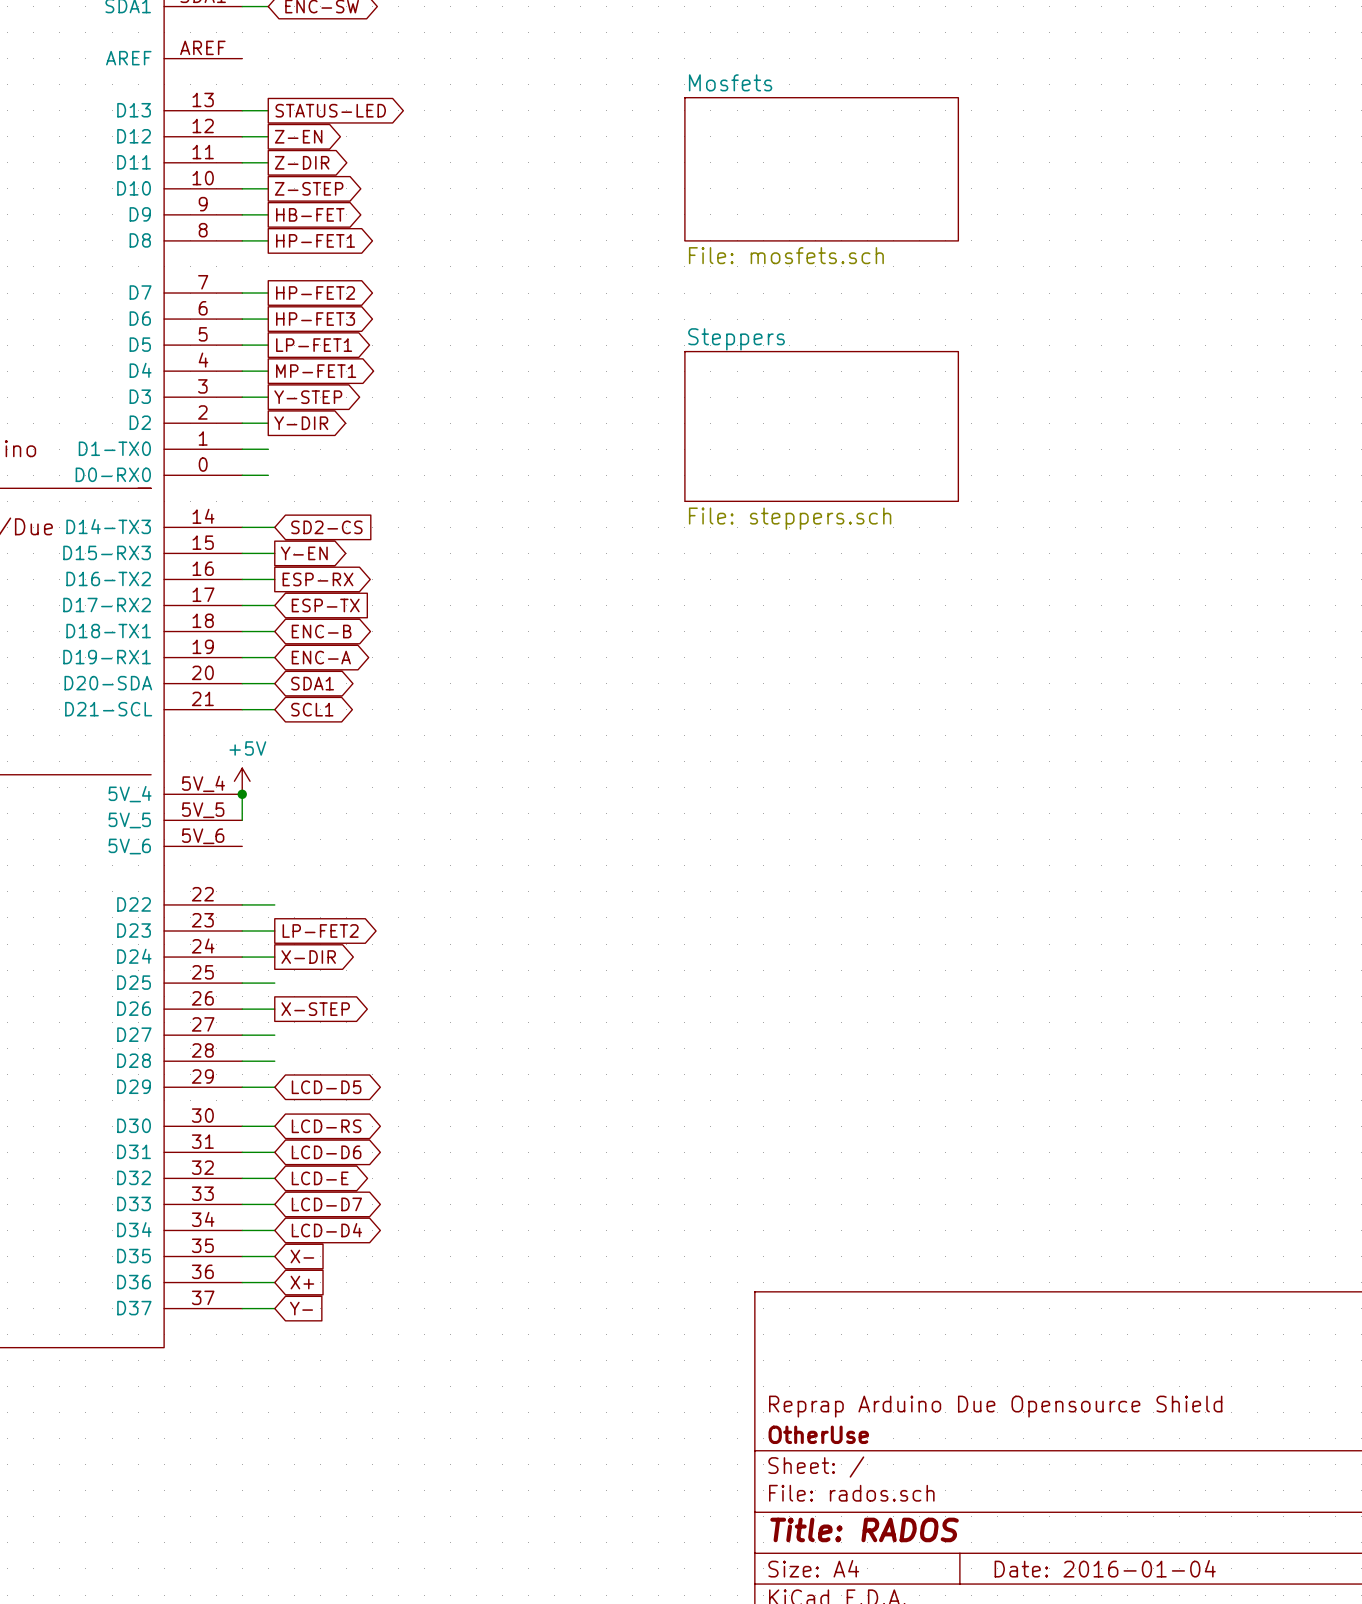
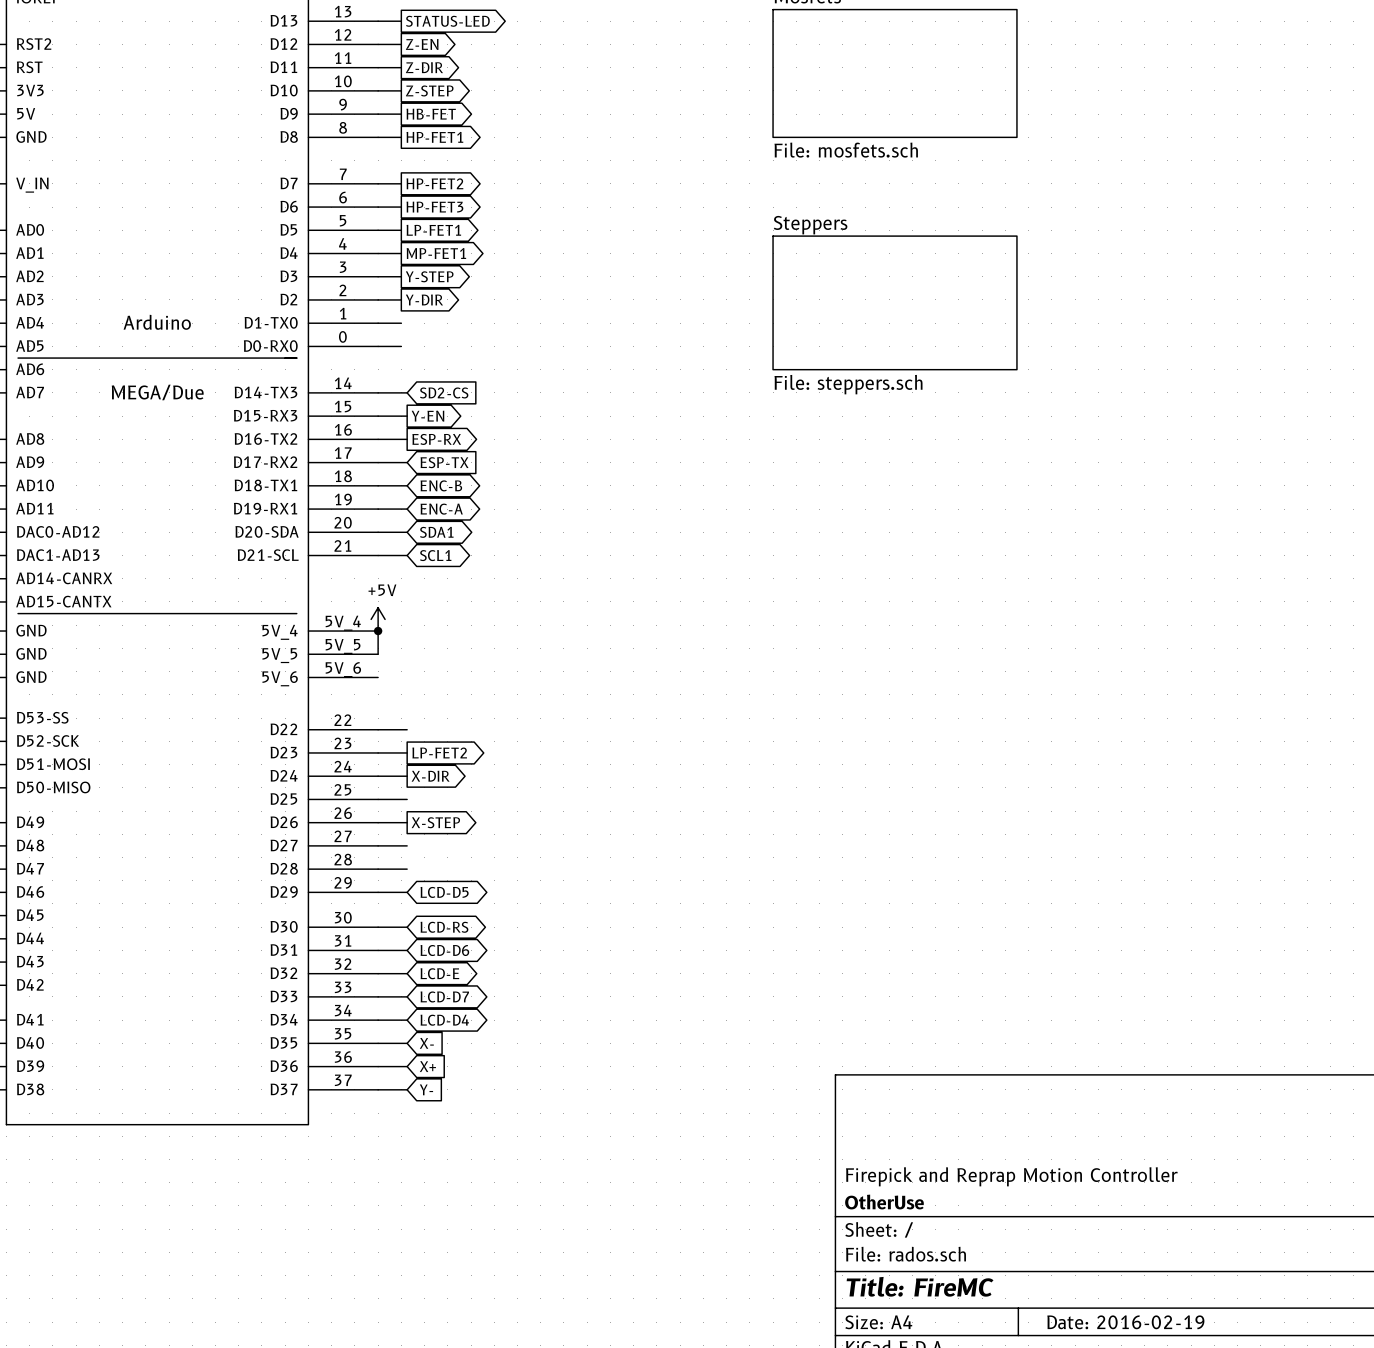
title block: Reprap Arduino Due Opensource Shield (995, 1406) -> Firepick and Reprap Motion Controller (1011, 1176)
title block: Title: RADOS (864, 1529) -> Title: FireMC (920, 1286)
title block: Date: 2016-01-04 (1105, 1568) -> Date: 2016-02-19 (1125, 1322)

